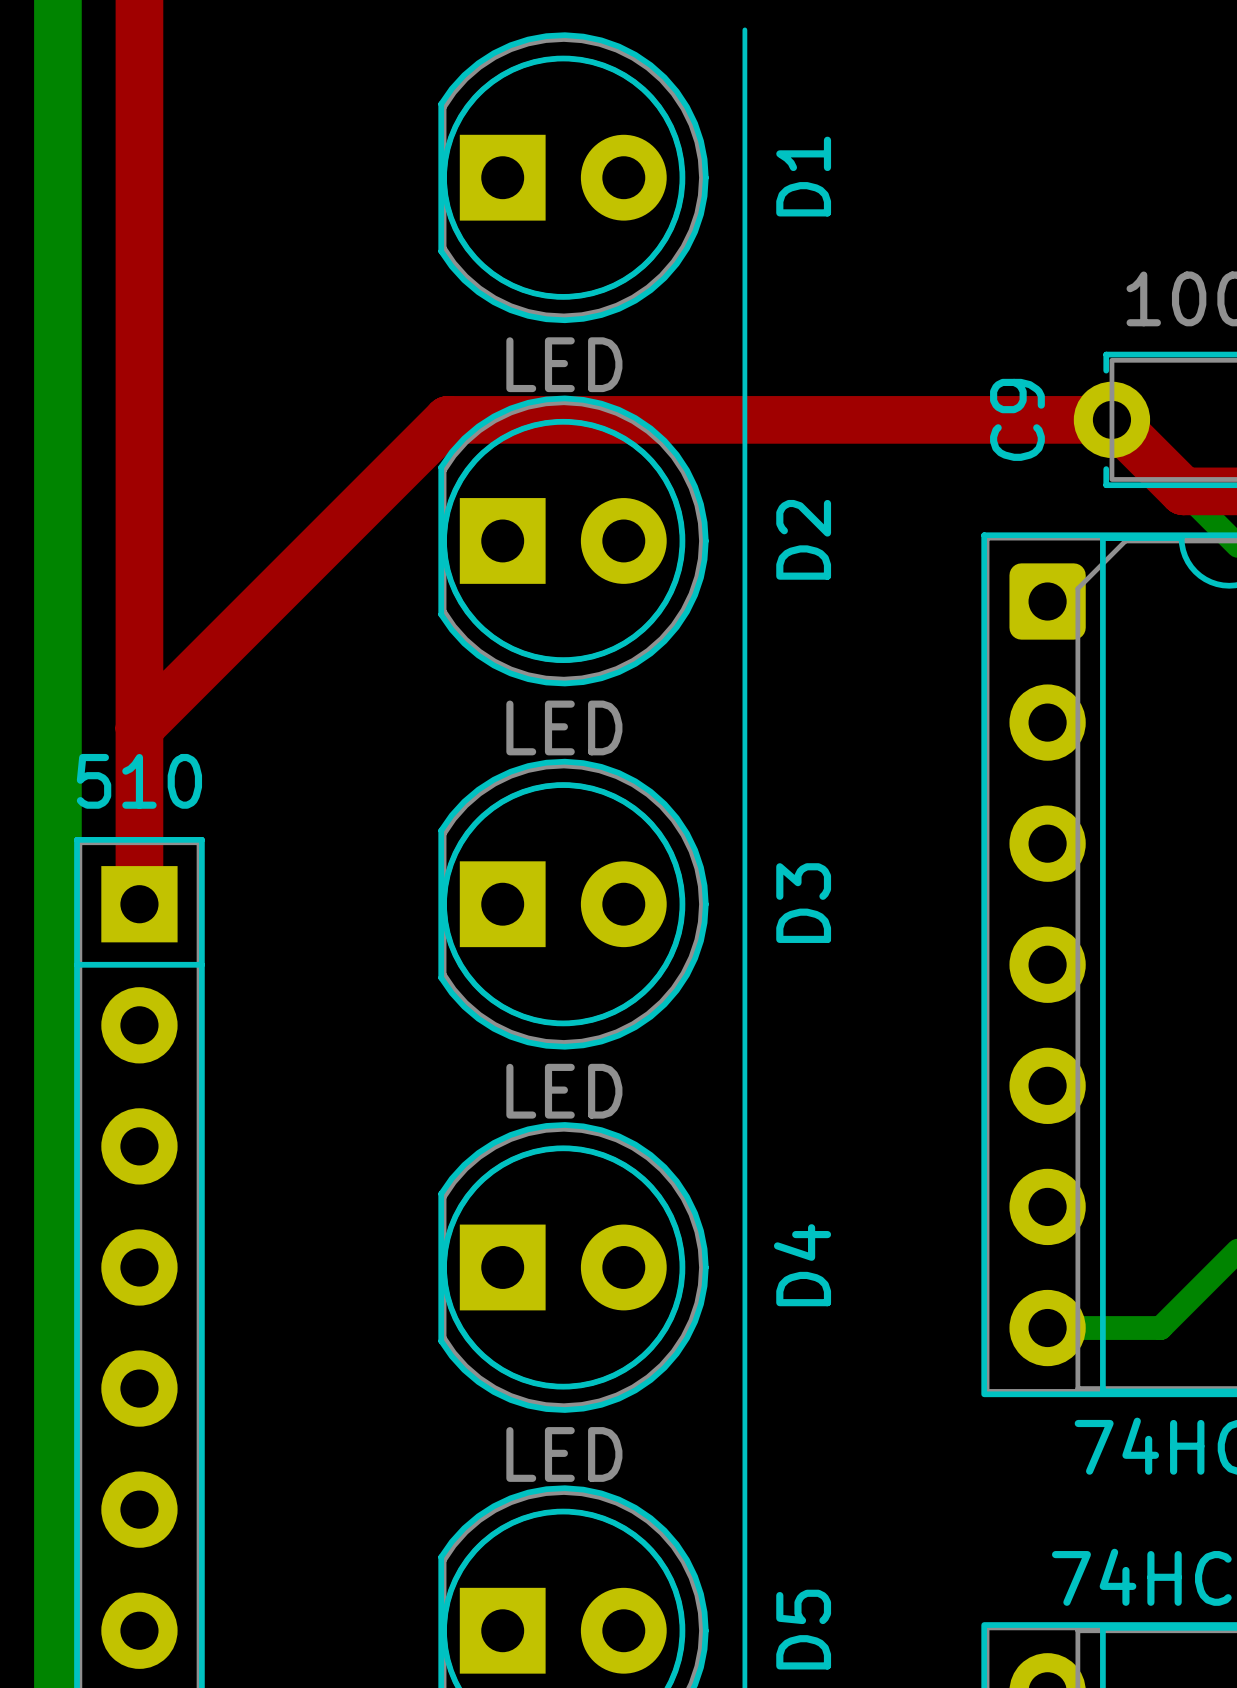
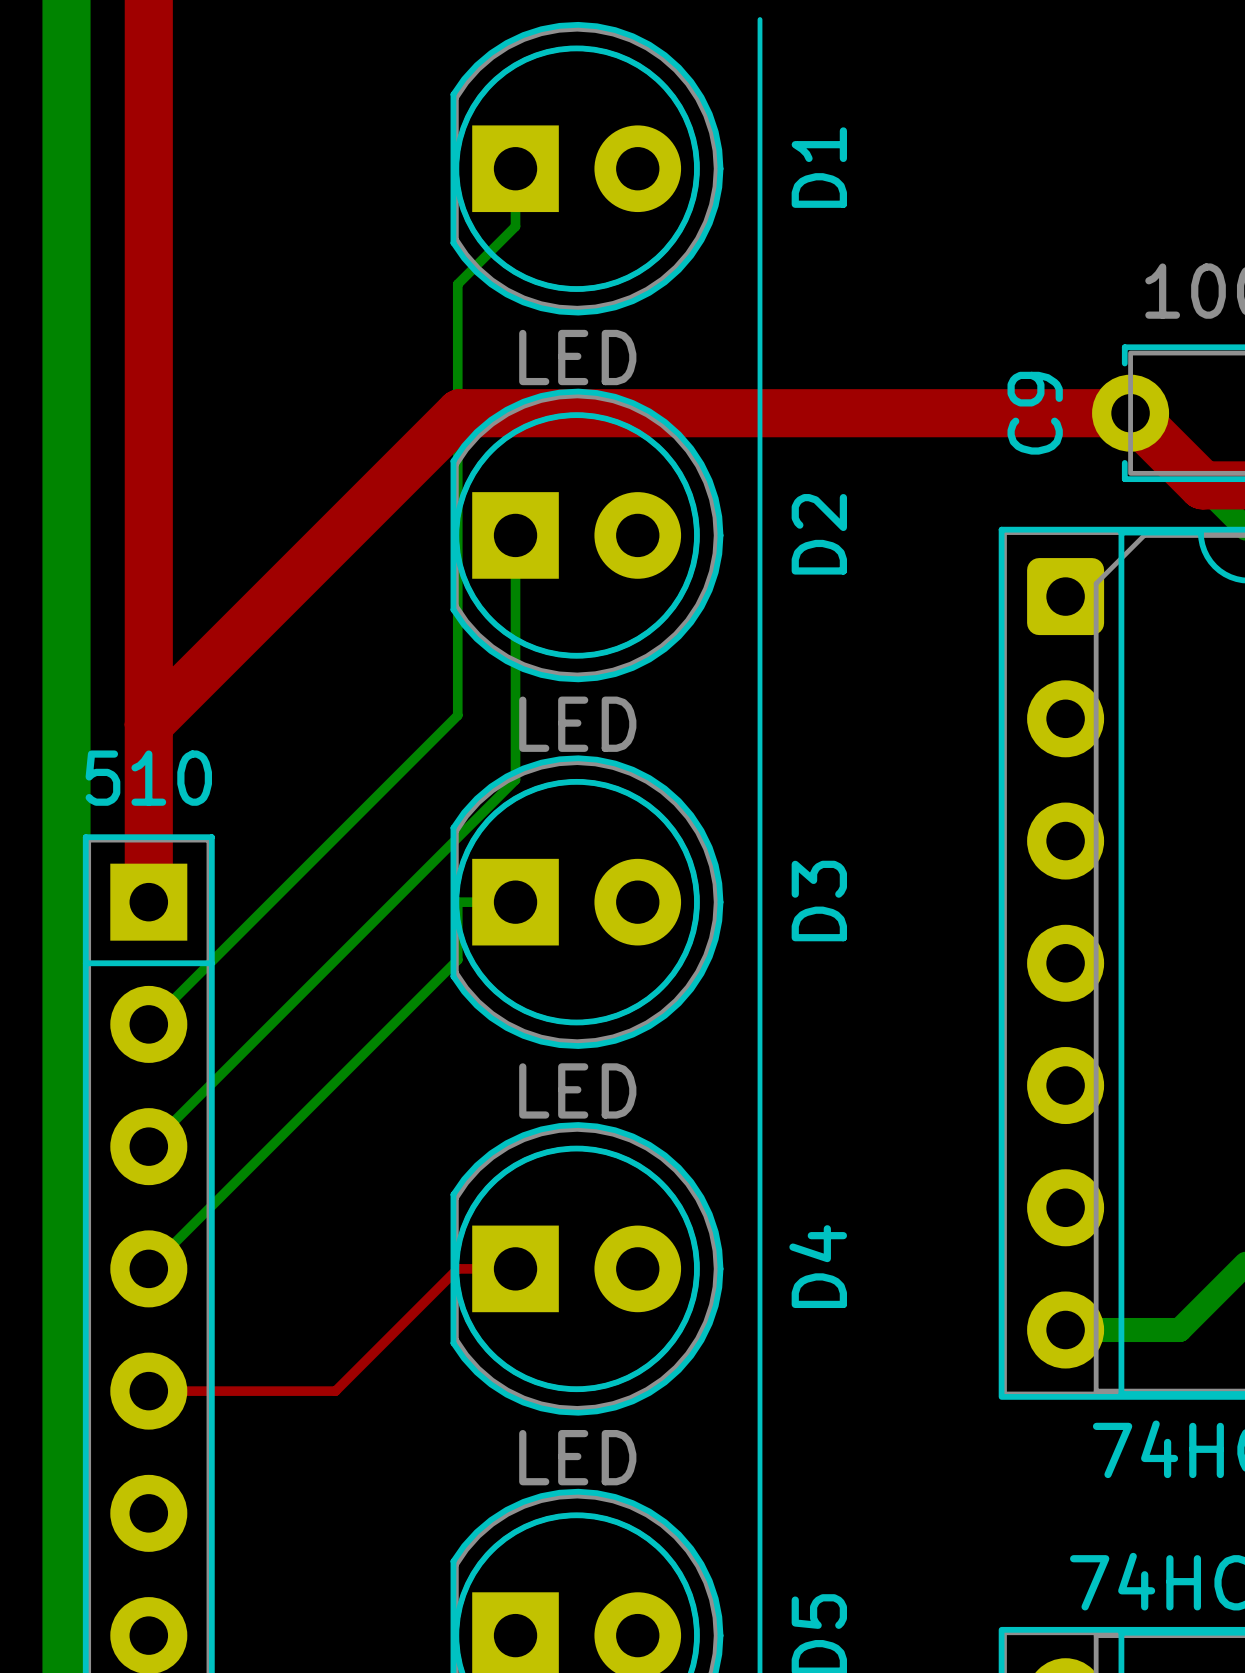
bottom track: none -> (515, 168) (515, 226) (457, 284) (457, 715) (148, 1024)
bottom track: none -> (515, 535) (515, 779) (148, 1146)
bottom track: none -> (515, 902) (457, 902) (457, 959) (148, 1268)
top track: none -> (515, 1268) (457, 1268) (335, 1391) (148, 1391)

